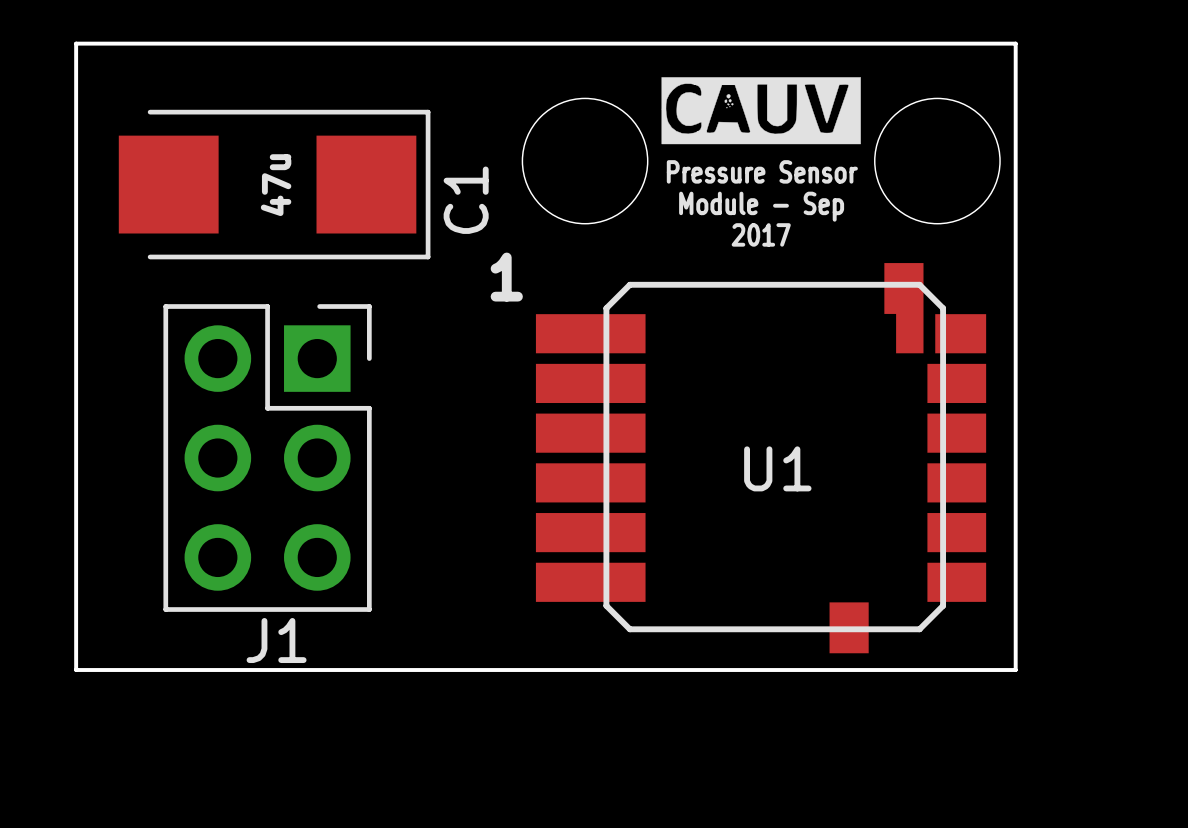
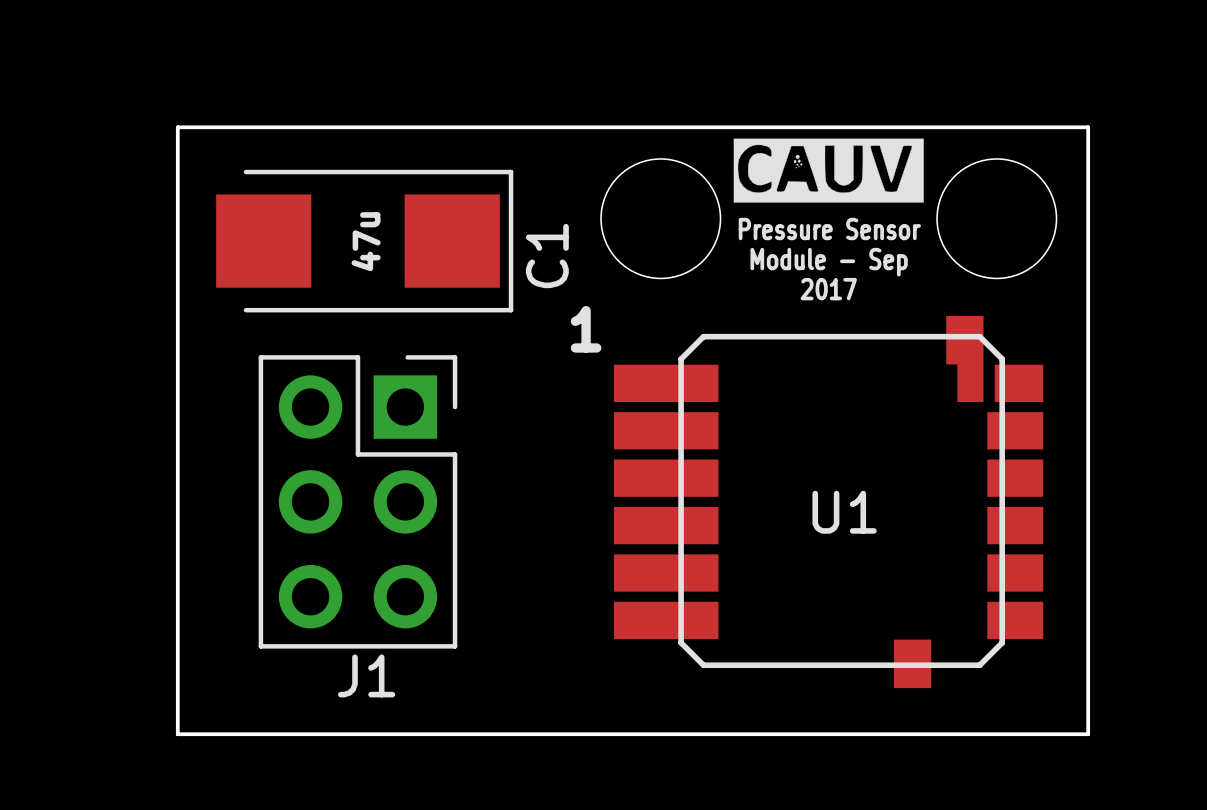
board edge: (76, 43) (1015, 43) (1015, 670) (76, 670) (76, 43) -> (177, 127) (177, 734) (1088, 734) (1088, 127) (177, 127)

